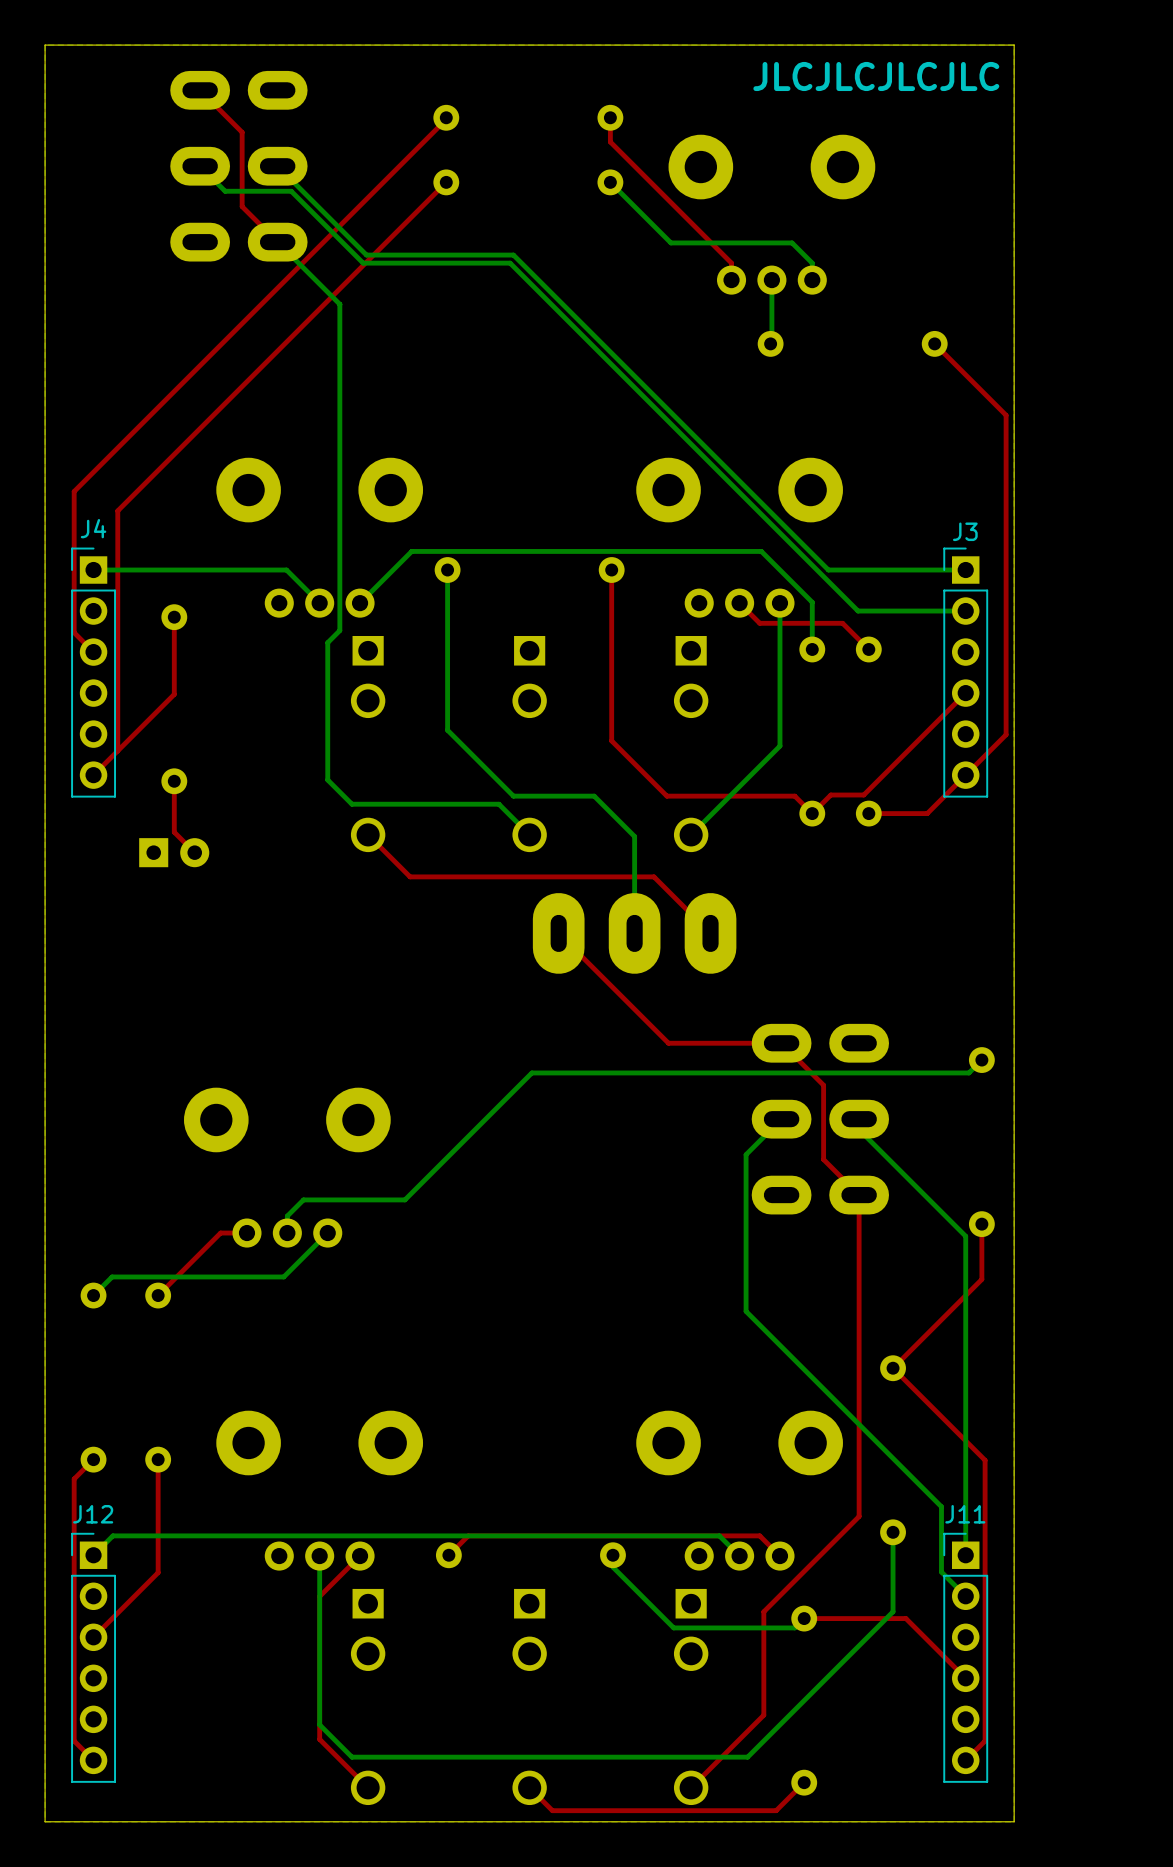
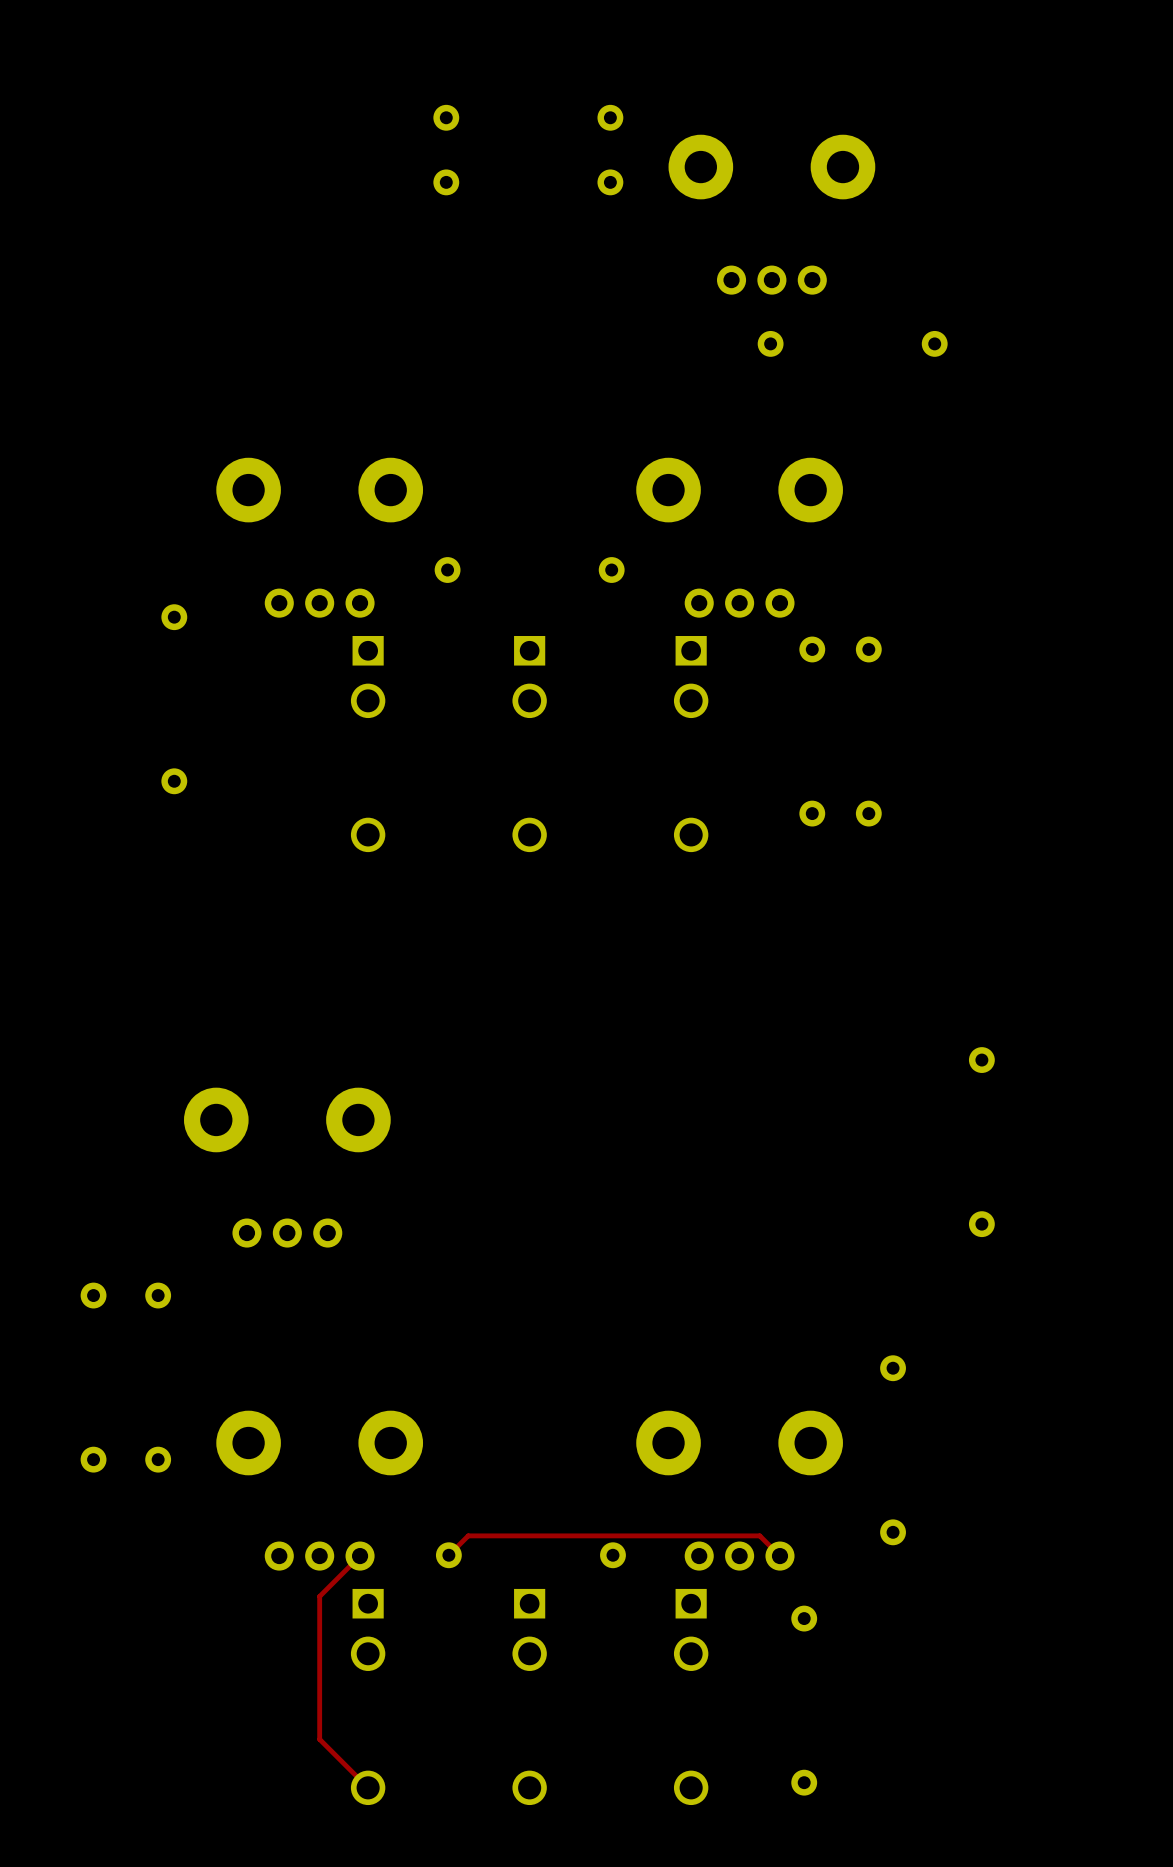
board edge: (1014, 45) (45, 45) (45, 1821) (1014, 1821) (1014, 45) -> none
text: JLCJLCJLCJLC (876, 76) -> none
top track: (200, 90) (242, 132) (242, 206) (277, 242) -> none
top track: (446, 117) (74, 491) (74, 632) (93, 652) -> none
top track: (610, 117) (610, 142) (731, 263) (731, 280) -> none
bottom track: (200, 166) (225, 191) (291, 191) (363, 263) (510, 263) (858, 611) (965, 611) -> none
part: (238, 166) -> none
bottom track: (277, 166) (366, 255) (513, 255) (828, 570) (965, 570) -> none
top track: (446, 182) (117, 510) (117, 750) -> none
bottom track: (610, 182) (670, 242) (792, 242) (812, 263) (812, 280) -> none
bottom track: (277, 242) (339, 304) (339, 630) (327, 642) (327, 779) (351, 804) (498, 804) (529, 834) -> none
bottom track: (771, 280) (770, 343) -> none
top track: (934, 343) (1006, 415) (1006, 734) (927, 813) (868, 813) -> none
bottom track: (93, 570) (286, 570) (319, 603) -> none
bottom track: (447, 570) (447, 730) (513, 796) (594, 796) (634, 836) (634, 933) -> none
top track: (611, 570) (611, 740) (666, 796) (794, 796) (812, 813) (830, 795) (863, 795) (965, 693) -> none
bottom track: (360, 603) (411, 551) (761, 551) (812, 602) (812, 649) -> none
top track: (739, 603) (759, 623) (842, 623) (868, 649) -> none
bottom track: (779, 603) (779, 746) (691, 834) -> none
top track: (174, 617) (174, 694) (92, 776) -> none
J4: (93, 672) -> none
J3: (965, 672) -> none
top track: (174, 781) (174, 832) (194, 852) -> none
top track: (368, 834) (410, 876) (654, 876) (710, 933) -> none
part: (174, 852) -> none
top track: (558, 933) (668, 1043) (781, 1043) (823, 1085) (823, 1159) (859, 1195) (859, 1516) (763, 1611) (763, 1715) (691, 1787) -> none
part: (634, 933) -> none
bottom track: (981, 1060) (968, 1072) (531, 1072) (404, 1199) (303, 1199) (287, 1216) (287, 1233) -> none
bottom track: (781, 1119) (746, 1154) (746, 1311) (941, 1506) (941, 1572) (965, 1596) -> none
part: (820, 1119) -> none
bottom track: (859, 1119) (859, 1129) (965, 1236) (965, 1555) -> none
top track: (981, 1224) (981, 1279) (893, 1368) (985, 1460) (985, 1741) (965, 1760) -> none
top track: (246, 1233) (220, 1233) (158, 1295) -> none
bottom track: (327, 1233) (283, 1276) (112, 1276) (93, 1295) -> none
top track: (93, 1459) (74, 1479) (74, 1741) (93, 1760) -> none
top track: (158, 1459) (158, 1572) (93, 1637) -> none
bottom track: (893, 1532) (893, 1611) (747, 1757) (351, 1757) (319, 1724) (319, 1556) -> none
bottom track: (93, 1555) (112, 1535) (719, 1535) (739, 1556) -> none
bottom track: (612, 1555) (612, 1567) (673, 1627) (794, 1627) (804, 1618) -> none
top track: (804, 1618) (905, 1618) (965, 1678) -> none
J12: (93, 1657) -> none
J11: (965, 1657) -> none
top track: (804, 1782) (776, 1810) (552, 1810) (529, 1787) (531, 1787) -> none

